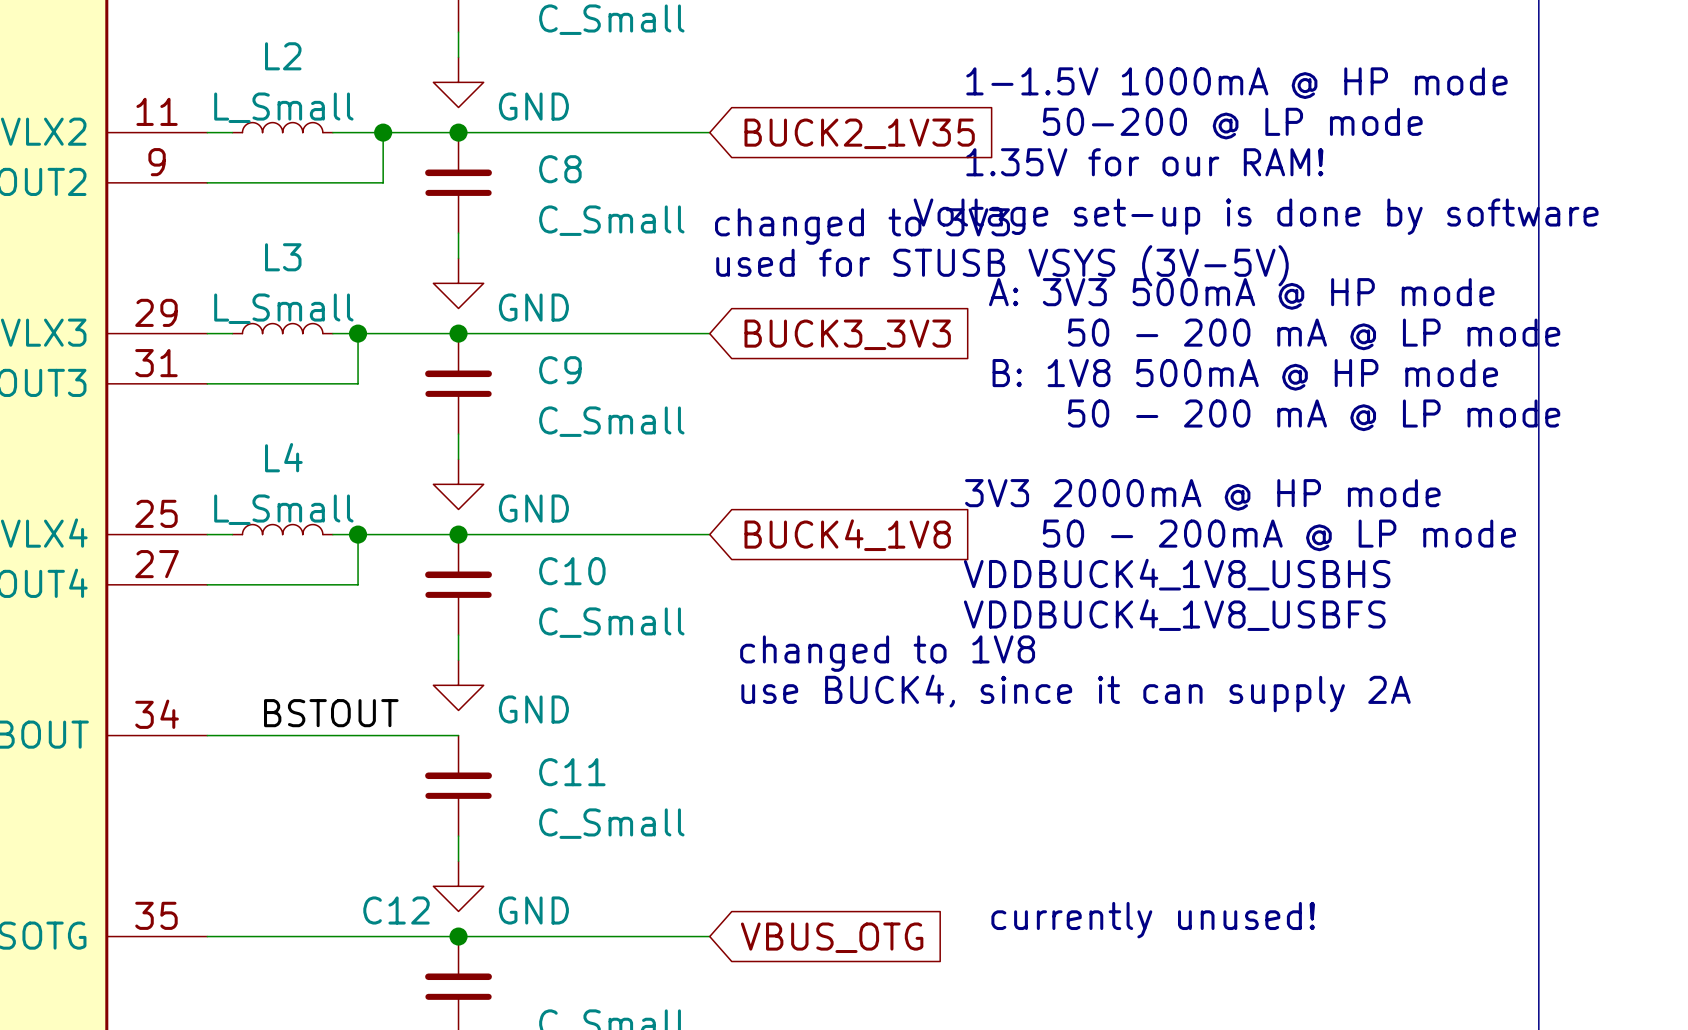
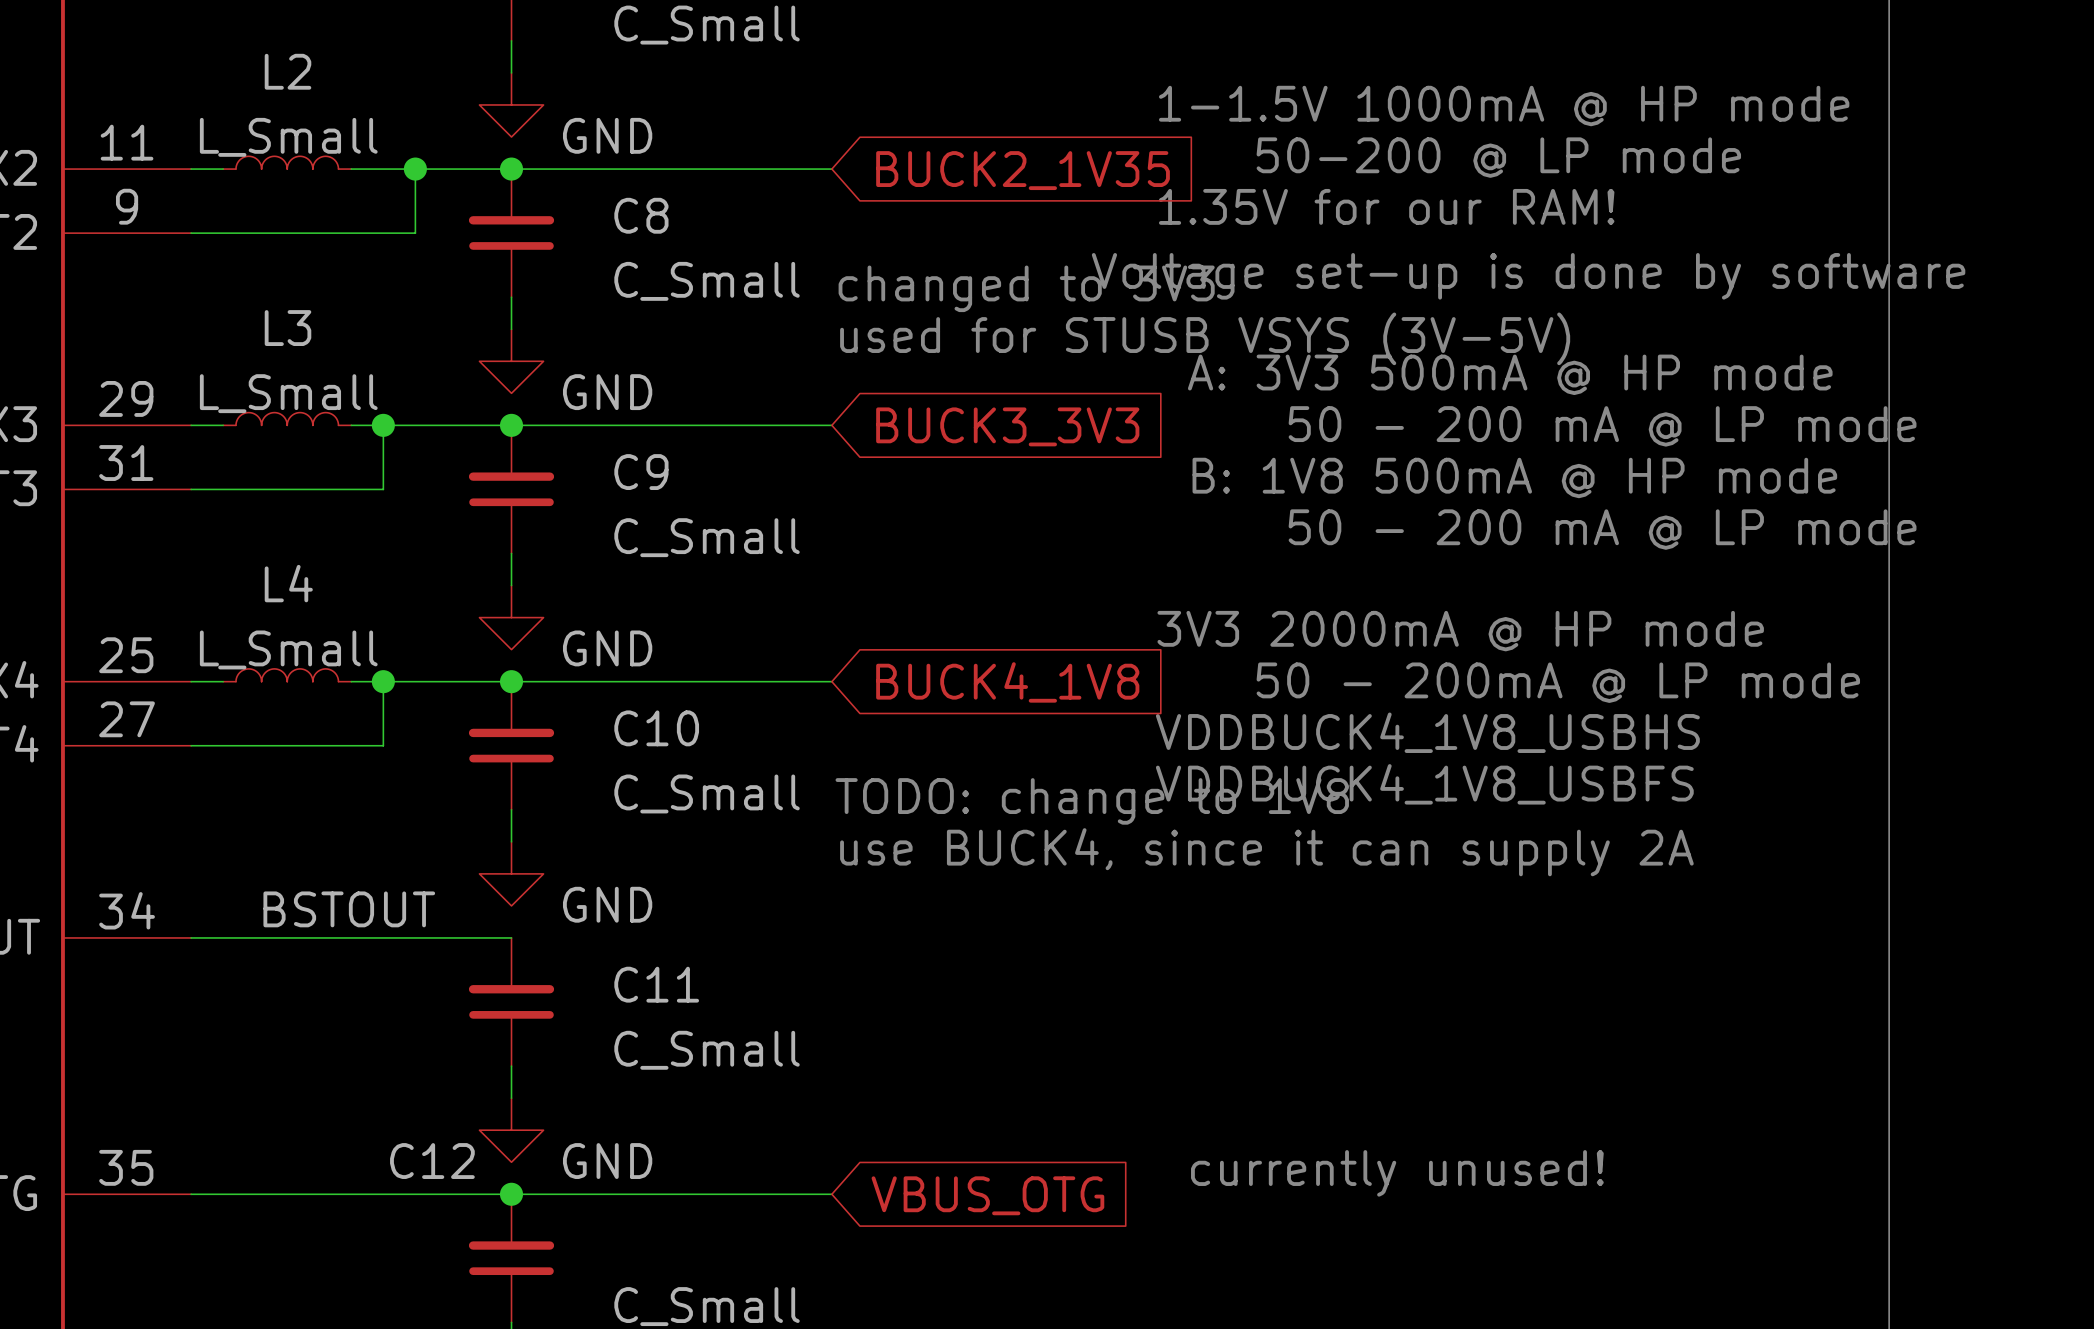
text: changed to 1V8 (887, 653) -> TODO: change to 1V8 (1092, 801)
text position: use BUCK4, since it can supply 2A (1076, 693) -> use BUCK4, since it can supply 2A (1266, 852)

